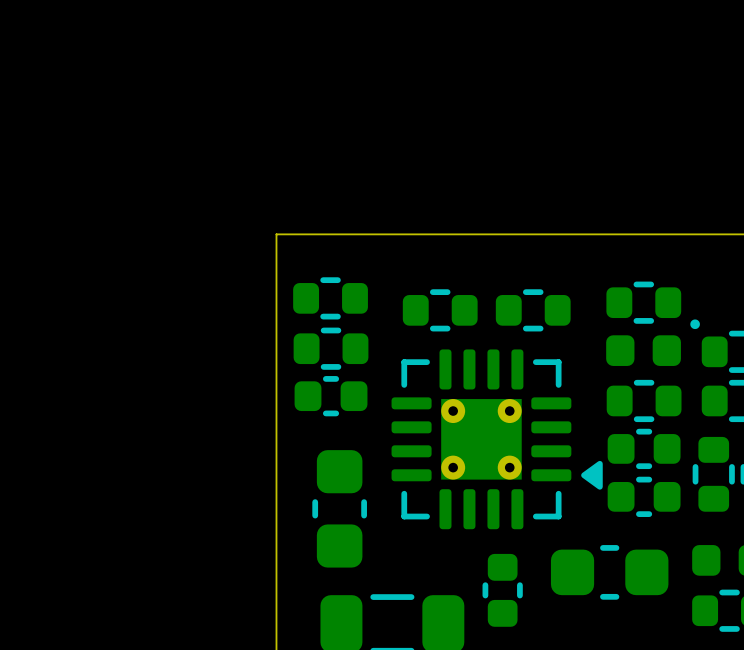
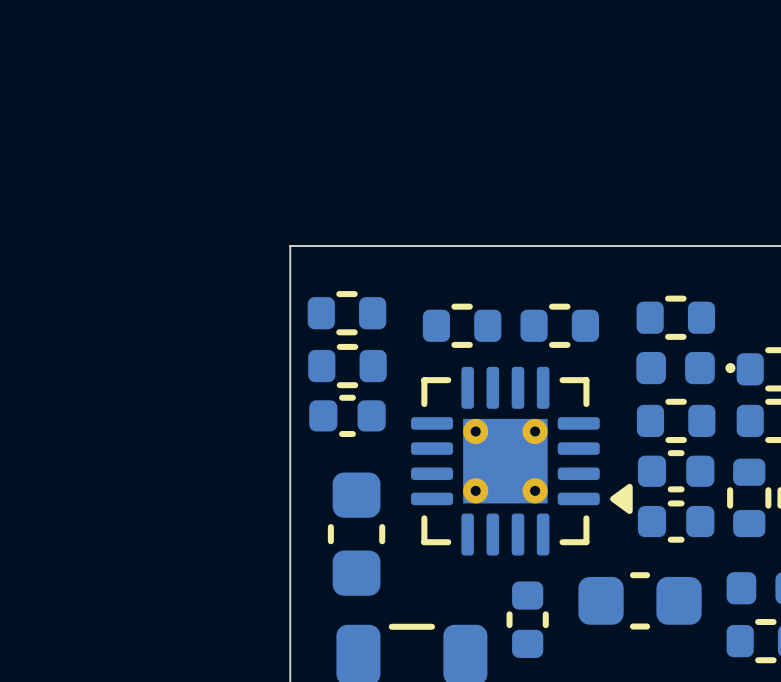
part footprint: [606, 319, 700, 366] -> [636, 351, 736, 385]

